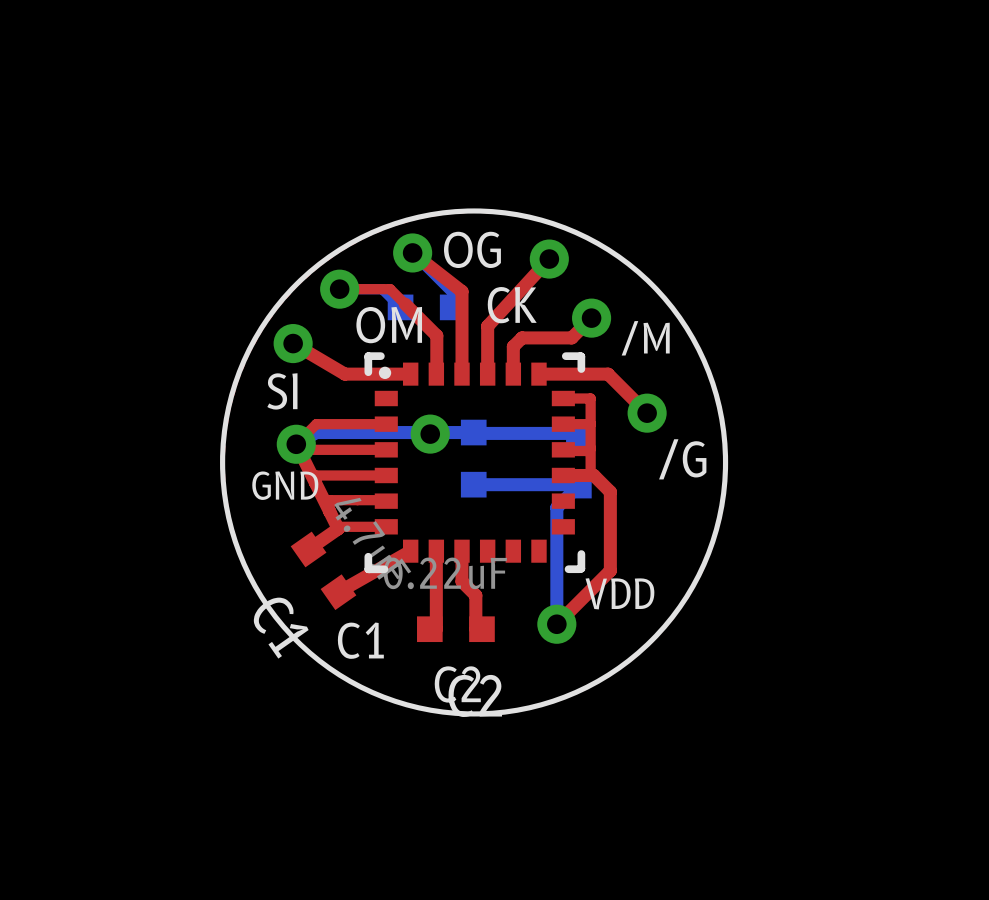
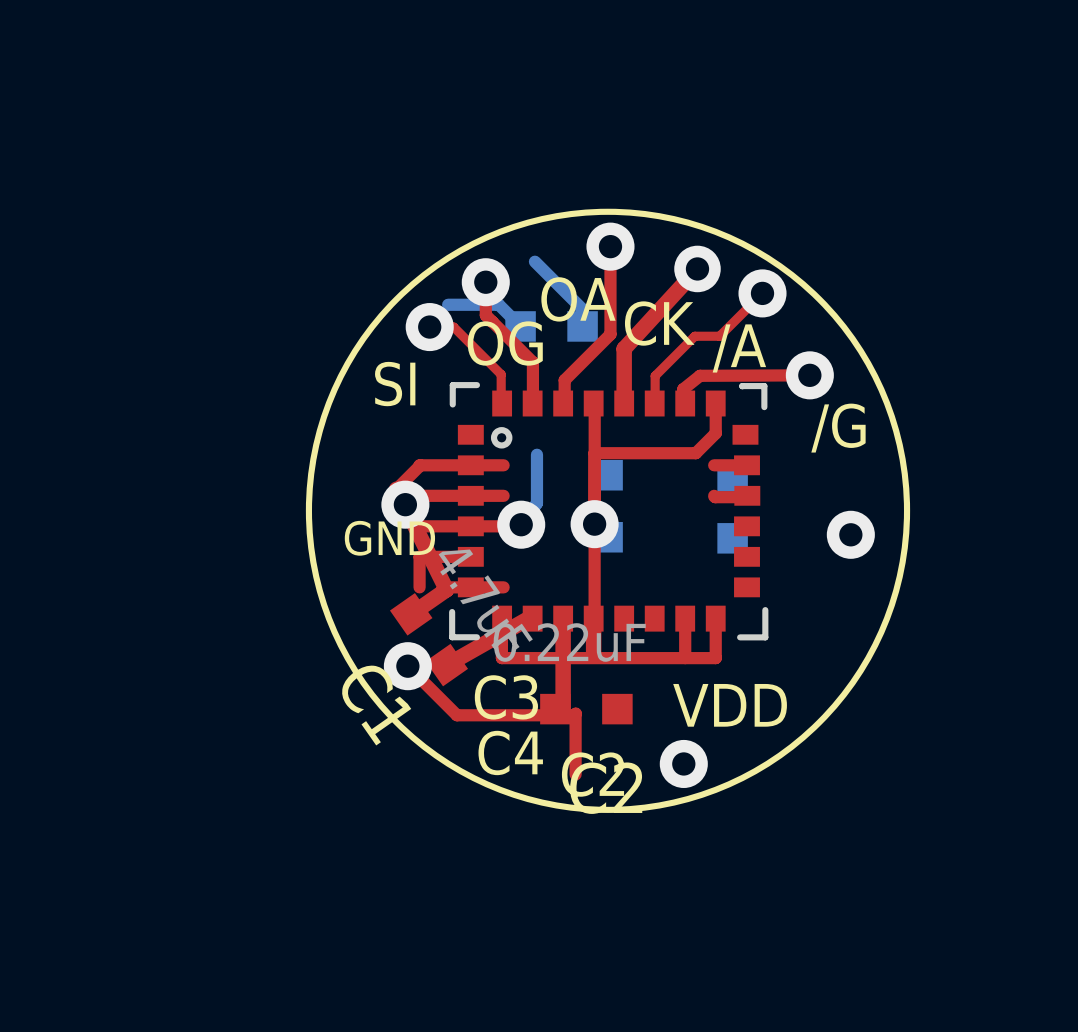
via: none -> (610, 246)
text: OG (472, 249) -> OA (578, 299)
top track: (412, 252) (462, 291) (462, 374) -> none
via: (412, 252) -> none
via: none -> (485, 282)
top track: none -> (762, 293) (719, 336) (694, 336) (655, 375) (655, 403)
top track: (339, 289) (390, 289) (436, 335) (436, 373) -> (610, 246) (610, 334) (564, 380) (563, 403)
via: (339, 289) -> none
top track: none -> (429, 327) (453, 327) (501, 374) (502, 403)
via: none -> (429, 327)
top track: (591, 318) (571, 337) (522, 337) (513, 346) (513, 374) -> none
via position: (591, 318) -> (762, 293)
text: none -> /A (739, 348)
text: OM (389, 325) -> OG (505, 343)
text: /M (645, 338) -> none
top track: (293, 343) (344, 374) (410, 374) -> (485, 282) (485, 315) (532, 362) (532, 403)
via: (293, 343) -> none
top track: none -> (809, 375) (700, 375) (683, 389) (686, 403)
via: none -> (809, 375)
part footprint: [364, 352, 586, 574] -> [449, 382, 769, 641]
top track: none -> (715, 403) (715, 433) (695, 453) (594, 453)
top track: (538, 374) (608, 374) (647, 413) -> none
text position: SI (282, 391) -> SI (395, 384)
top track: (563, 398) (590, 398) (590, 475) (563, 475) (593, 475) (610, 491) (610, 570) (556, 624) -> none
via: (647, 413) -> none
bottom track: none -> (536, 454) (536, 503) (521, 524)
bottom track: (578, 433) (316, 432) (296, 444) -> none
via position: (430, 434) -> (594, 524)
via position: (296, 444) -> (405, 504)
text position: /G (682, 459) -> /G (838, 428)
via: none -> (521, 524)
via: none -> (850, 534)
bottom track: (473, 484) (578, 485) (556, 507) (556, 624) -> none
top track: none -> (470, 556) (419, 556) (419, 587)
top track: (386, 501) (329, 500) (329, 511) -> none
top track: none -> (501, 618) (501, 658) (715, 658) (715, 618)
top track: none -> (685, 618) (685, 658)
top track: (462, 581) (475, 595) (475, 629) (481, 629) -> none
top track: none -> (407, 666) (456, 715) (574, 715) (575, 713)
via: none -> (407, 666)
text position: VDD (619, 593) -> VDD (730, 705)
text: none -> C3 (506, 697)
via: (556, 624) -> none
top track: none -> (575, 713) (575, 774)
text: C1 (360, 640) -> none
text: none -> C4 (510, 752)
via: none -> (683, 763)

